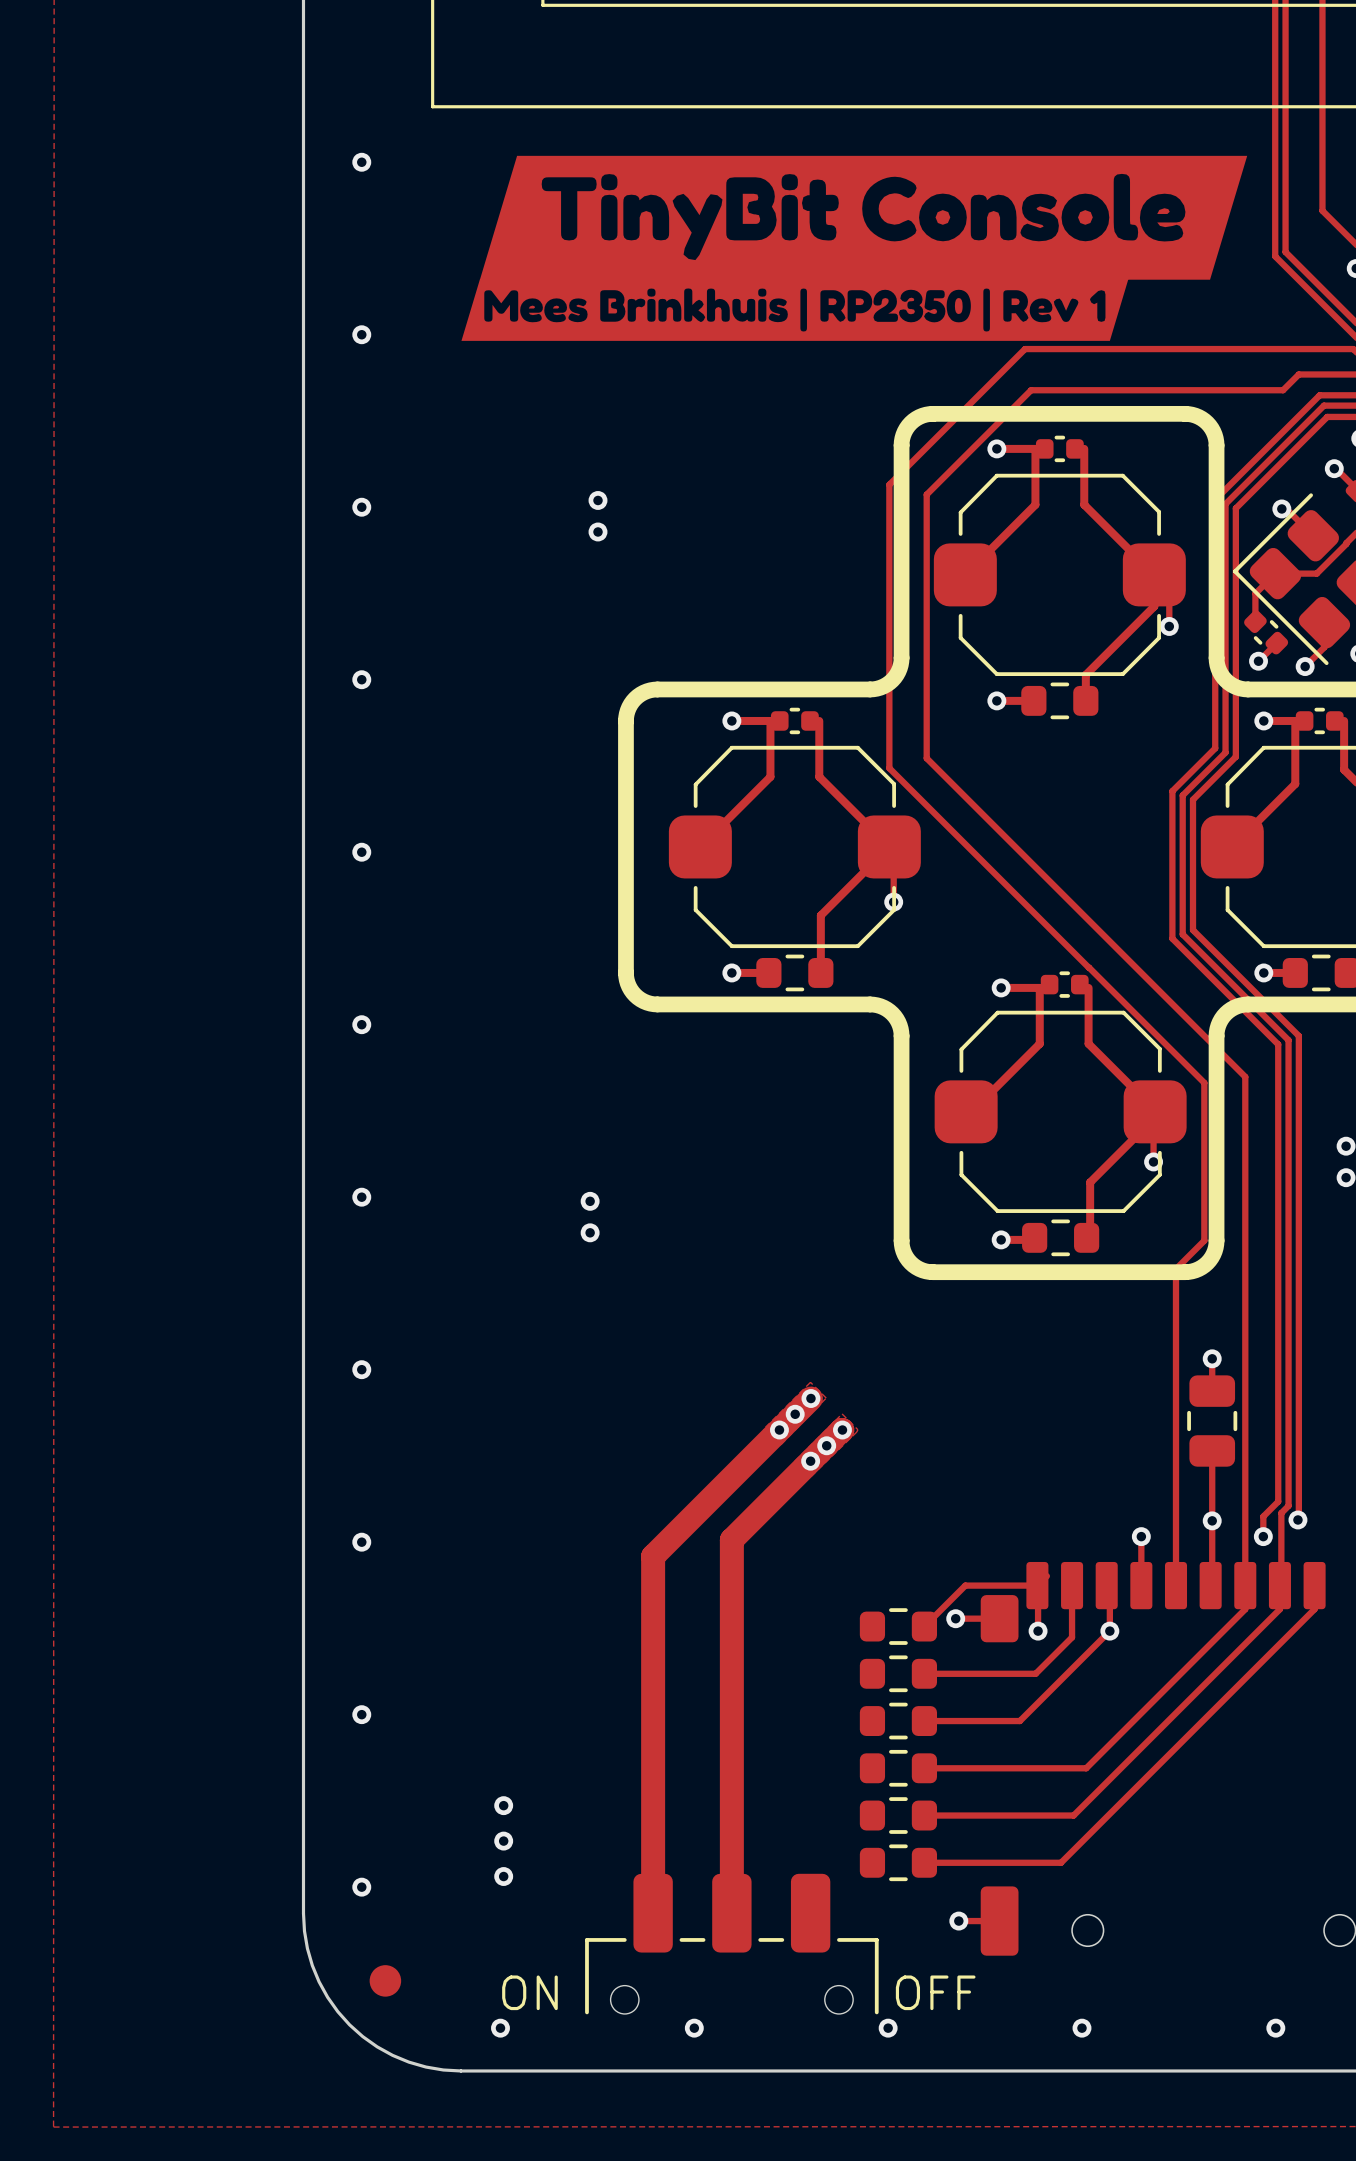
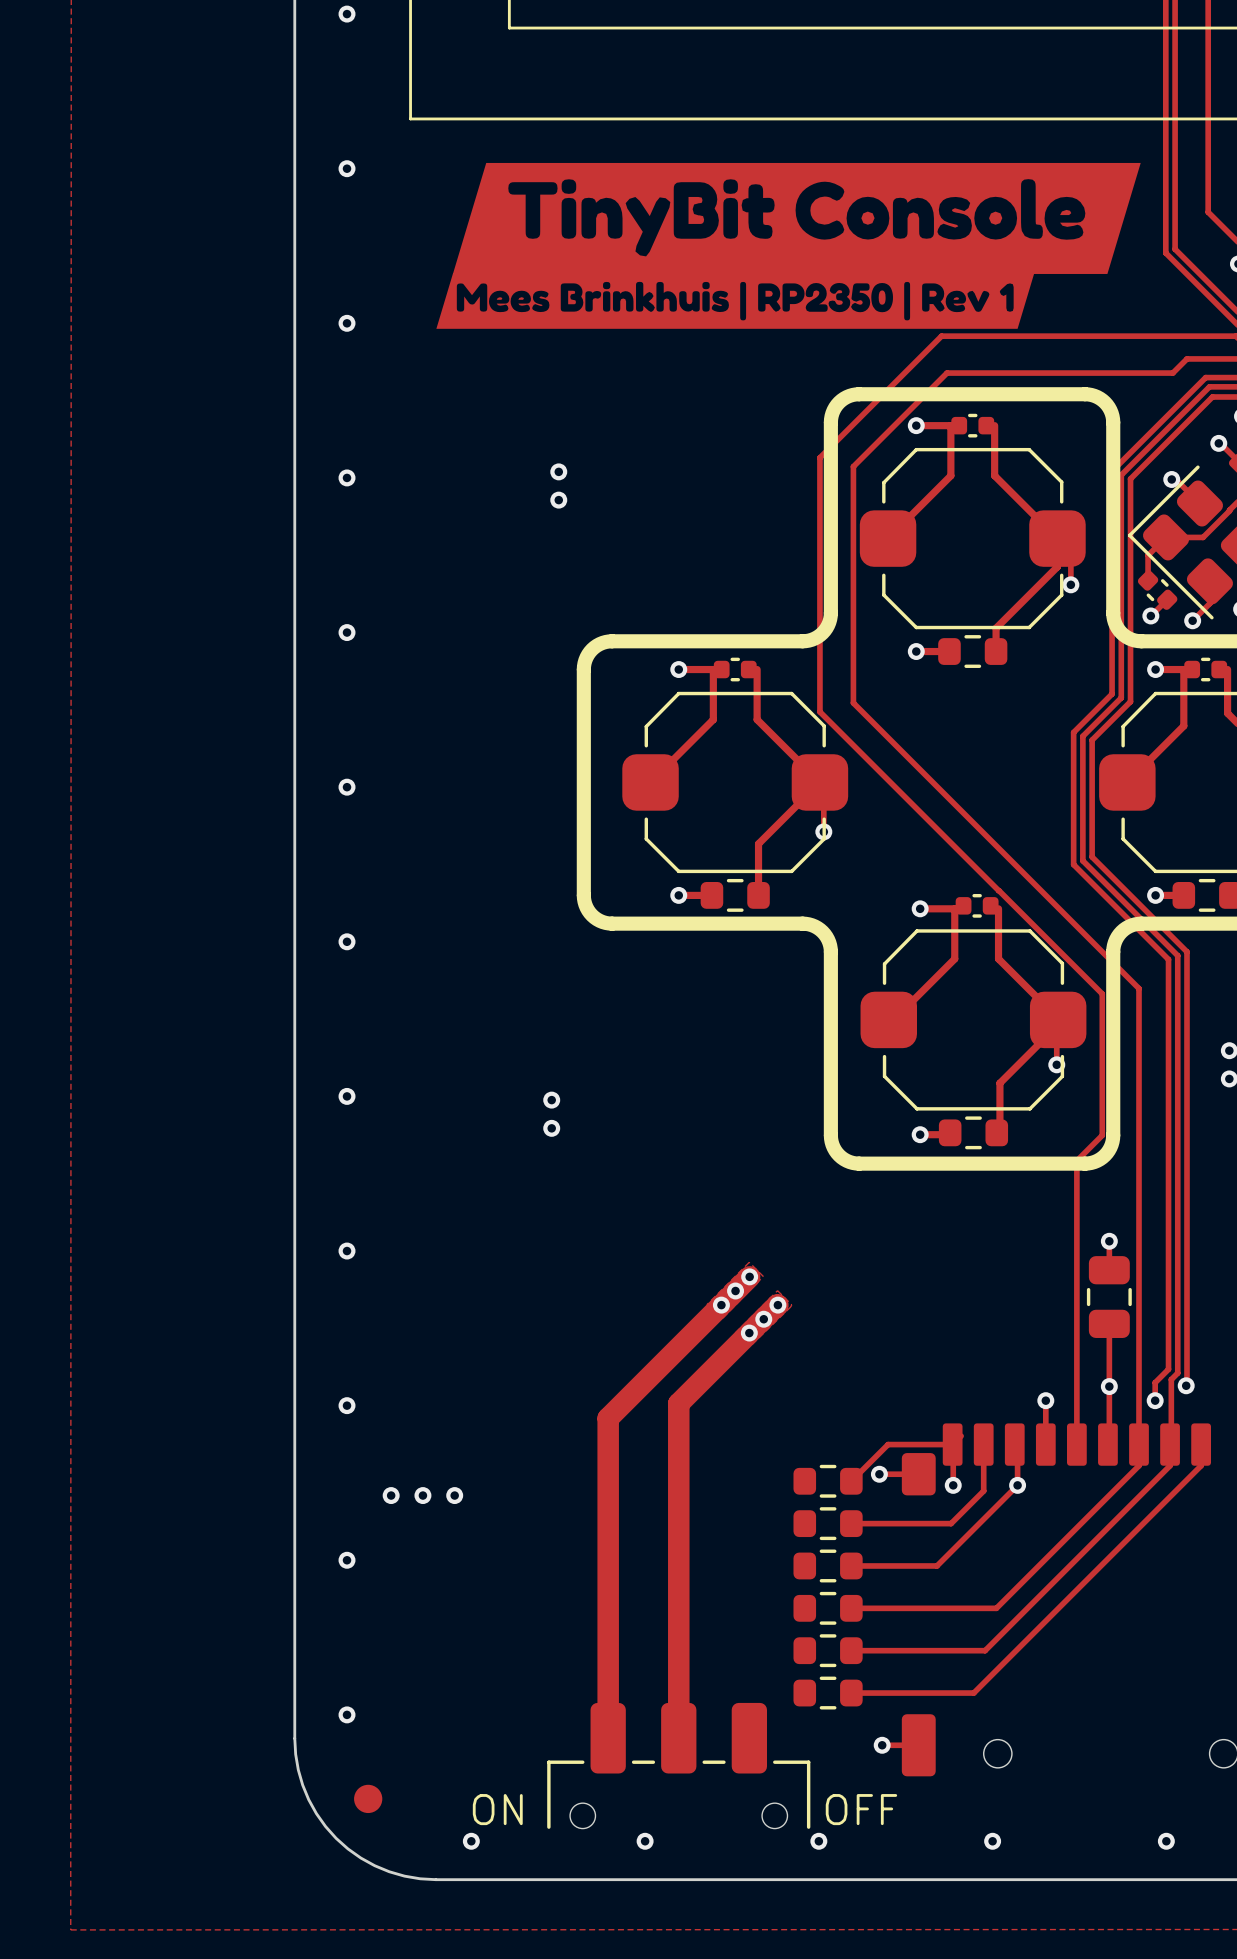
via: none -> (391, 1495)
via: none -> (422, 1495)
via: none -> (454, 1495)
via: (503, 1805) -> none
via: (503, 1841) -> none
via: (503, 1876) -> none

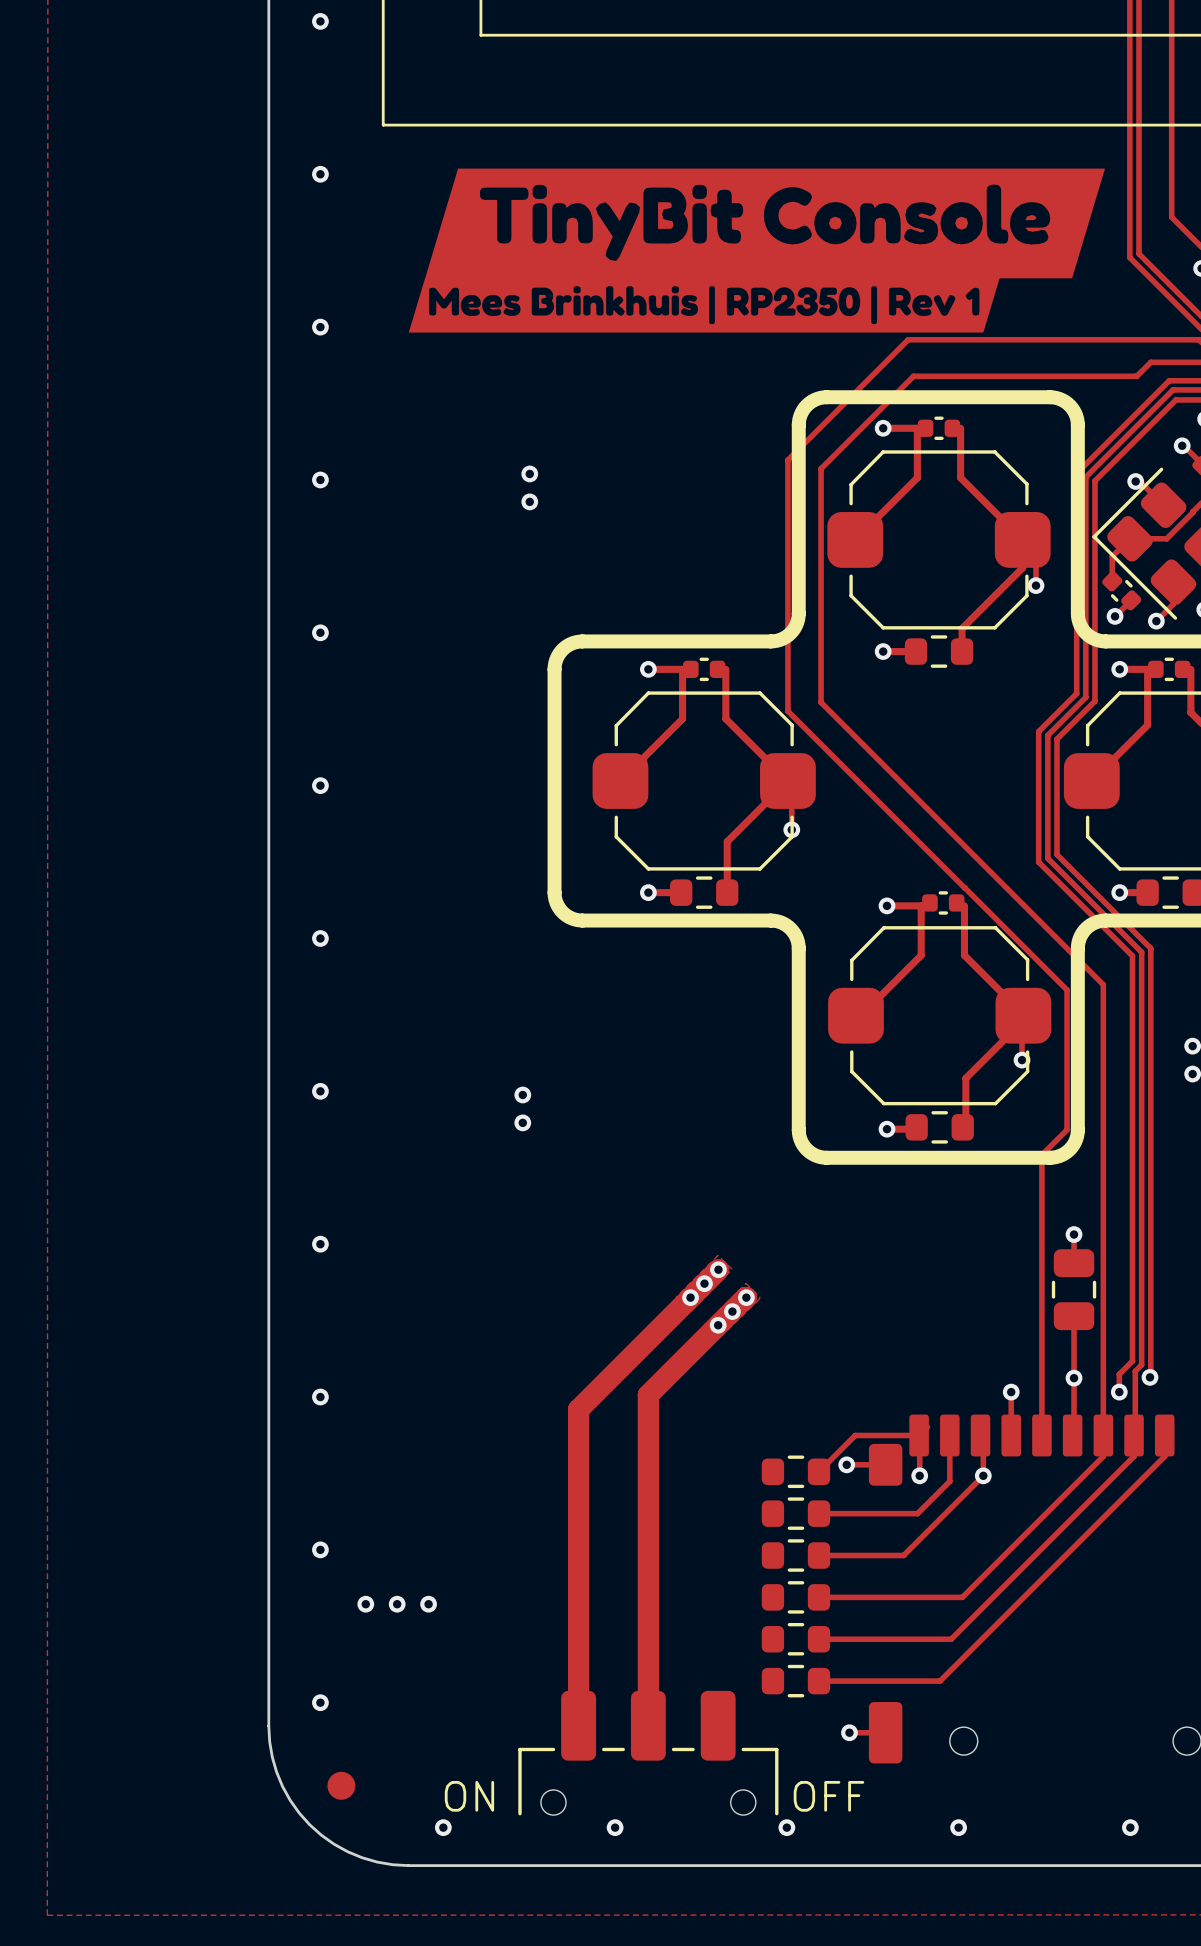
via: (391, 1495) -> none
via: (422, 1495) -> none
via: (454, 1495) -> none
via: none -> (365, 1604)
via: none -> (397, 1604)
via: none -> (428, 1604)

